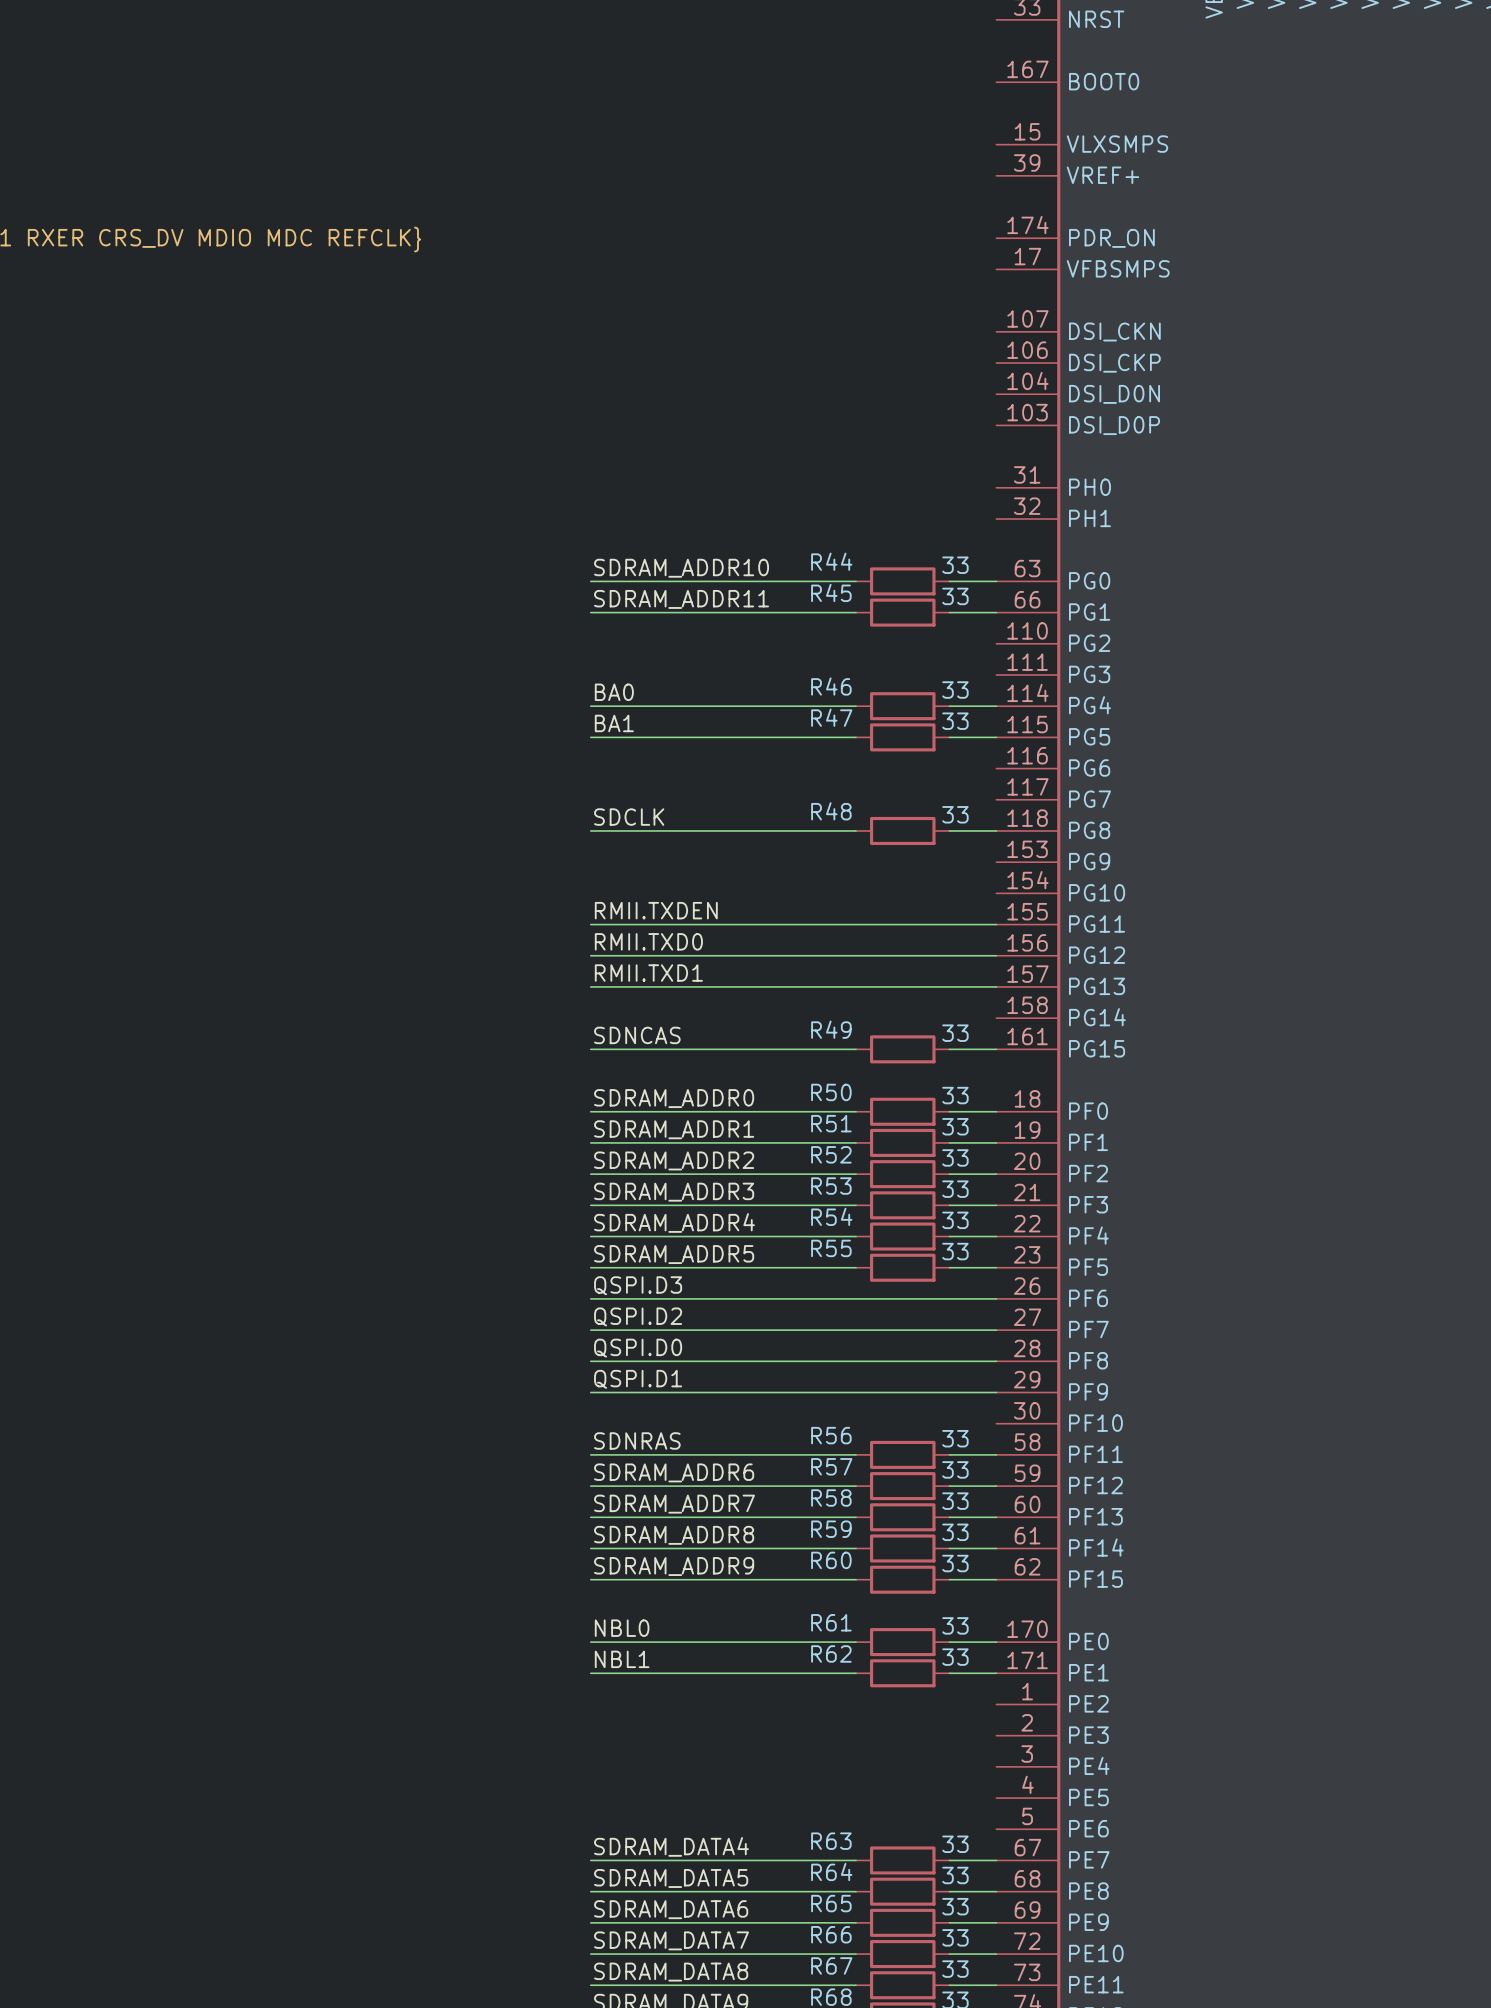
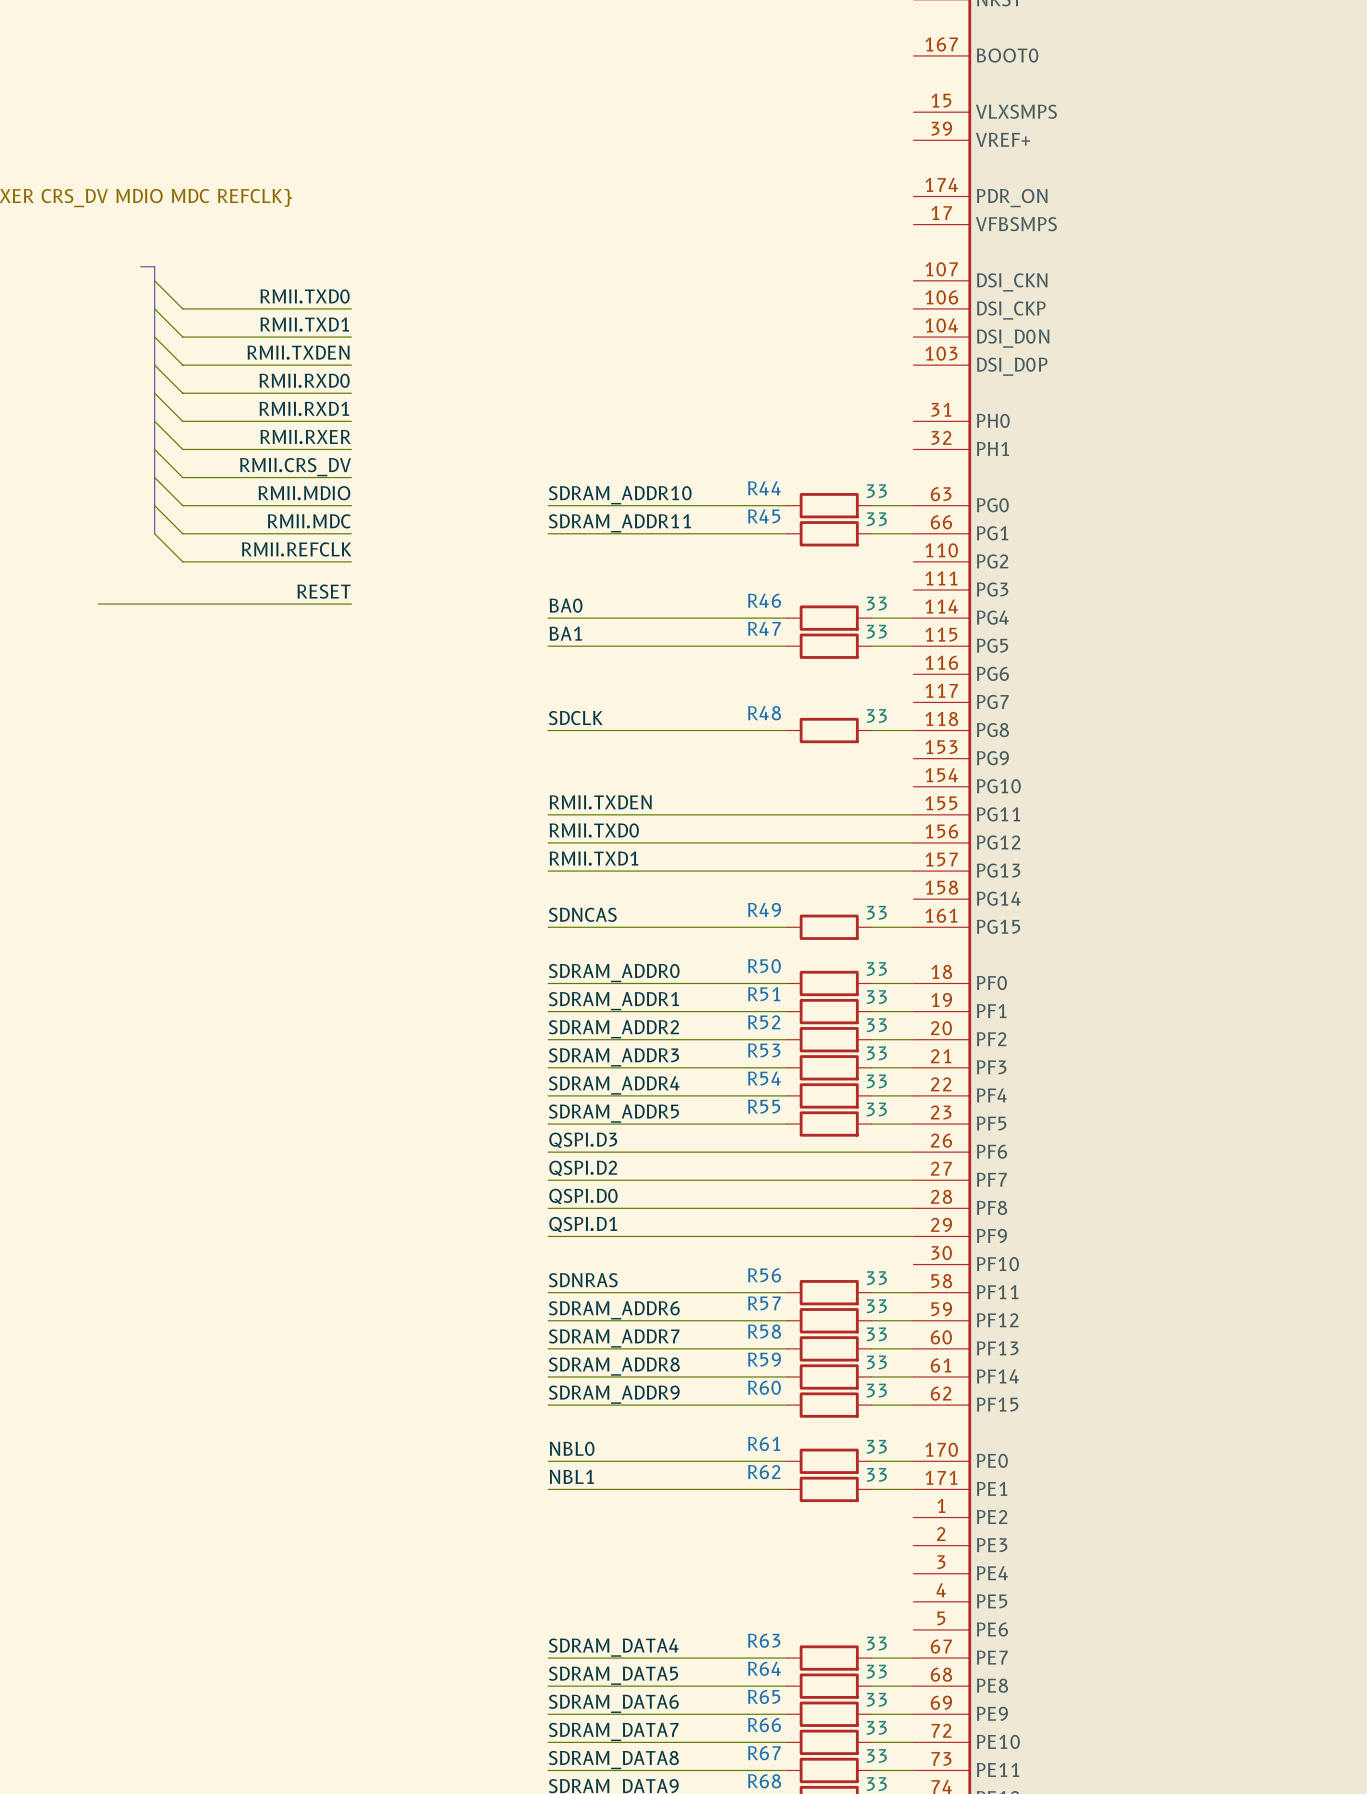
bus: none -> (140, 266) (154, 266) (154, 533)
wire: none -> (154, 280) (182, 308) (351, 308)
label: none -> RMII.TXD0 (305, 296)
wire: none -> (154, 308) (182, 337) (351, 337)
label: none -> RMII.TXD1 (304, 324)
wire: none -> (154, 337) (182, 365) (351, 365)
label: none -> RMII.TXDEN (298, 352)
wire: none -> (154, 365) (182, 393) (351, 393)
label: none -> RMII.RXD0 (304, 380)
wire: none -> (154, 393) (182, 421) (351, 421)
label: none -> RMII.RXD1 (304, 408)
wire: none -> (154, 421) (182, 449) (351, 449)
label: none -> RMII.RXER (305, 436)
wire: none -> (154, 449) (182, 477) (351, 477)
label: none -> RMII.CRS_DV (295, 467)
wire: none -> (154, 477) (182, 505) (351, 505)
label: none -> RMII.MDIO (304, 493)
wire: none -> (154, 505) (182, 533) (351, 533)
label: none -> RMII.MDC (309, 521)
wire: none -> (154, 533) (182, 561) (351, 561)
label: none -> RMII.REFCLK (296, 549)
label: none -> RESET (324, 591)
wire: none -> (98, 604) (351, 604)

